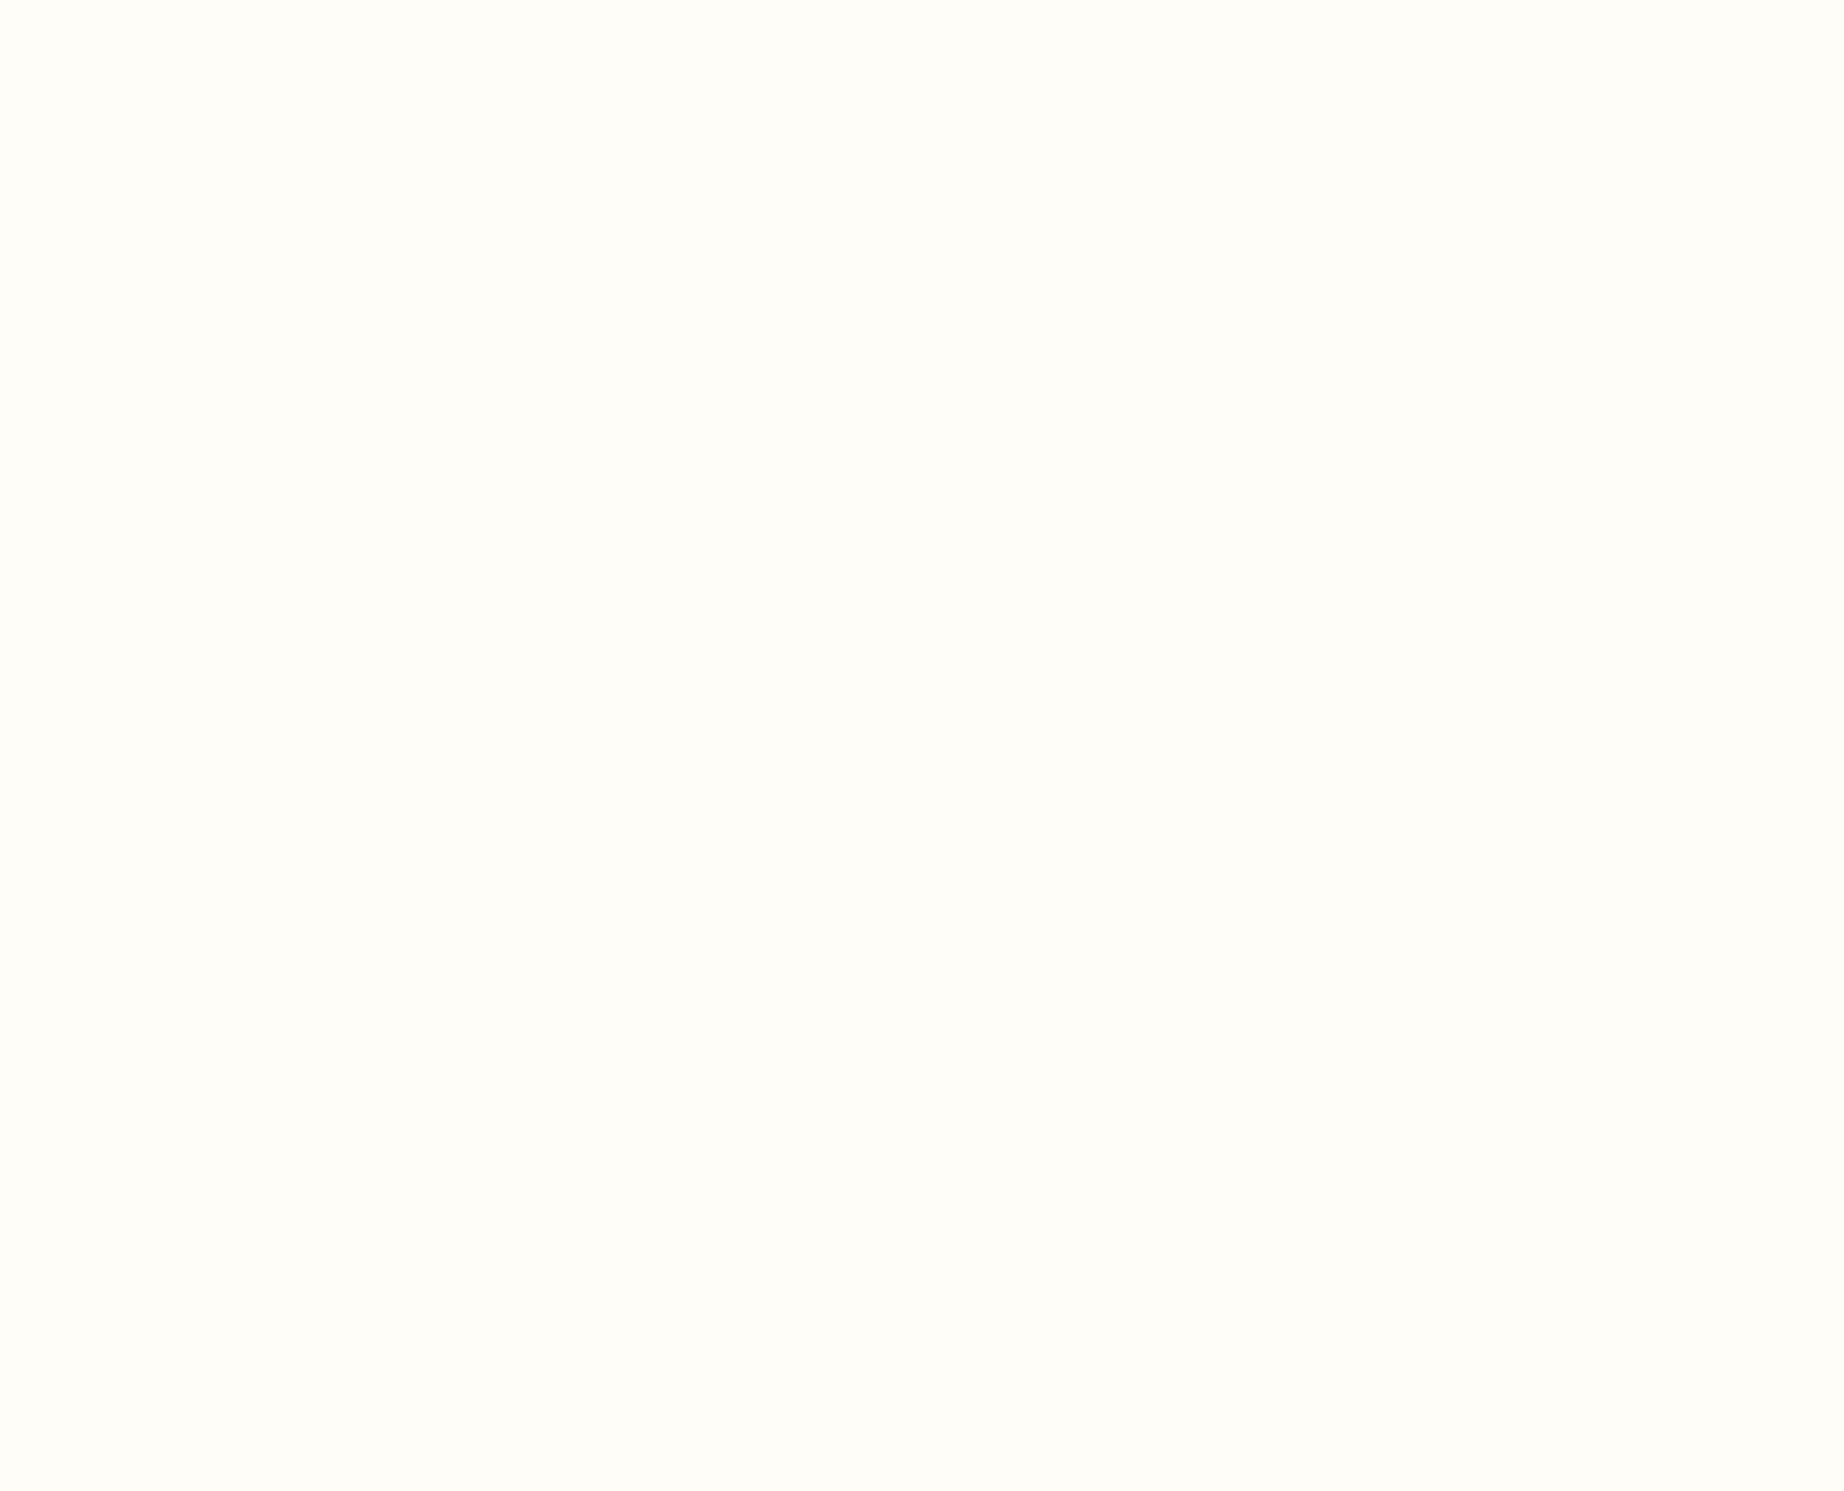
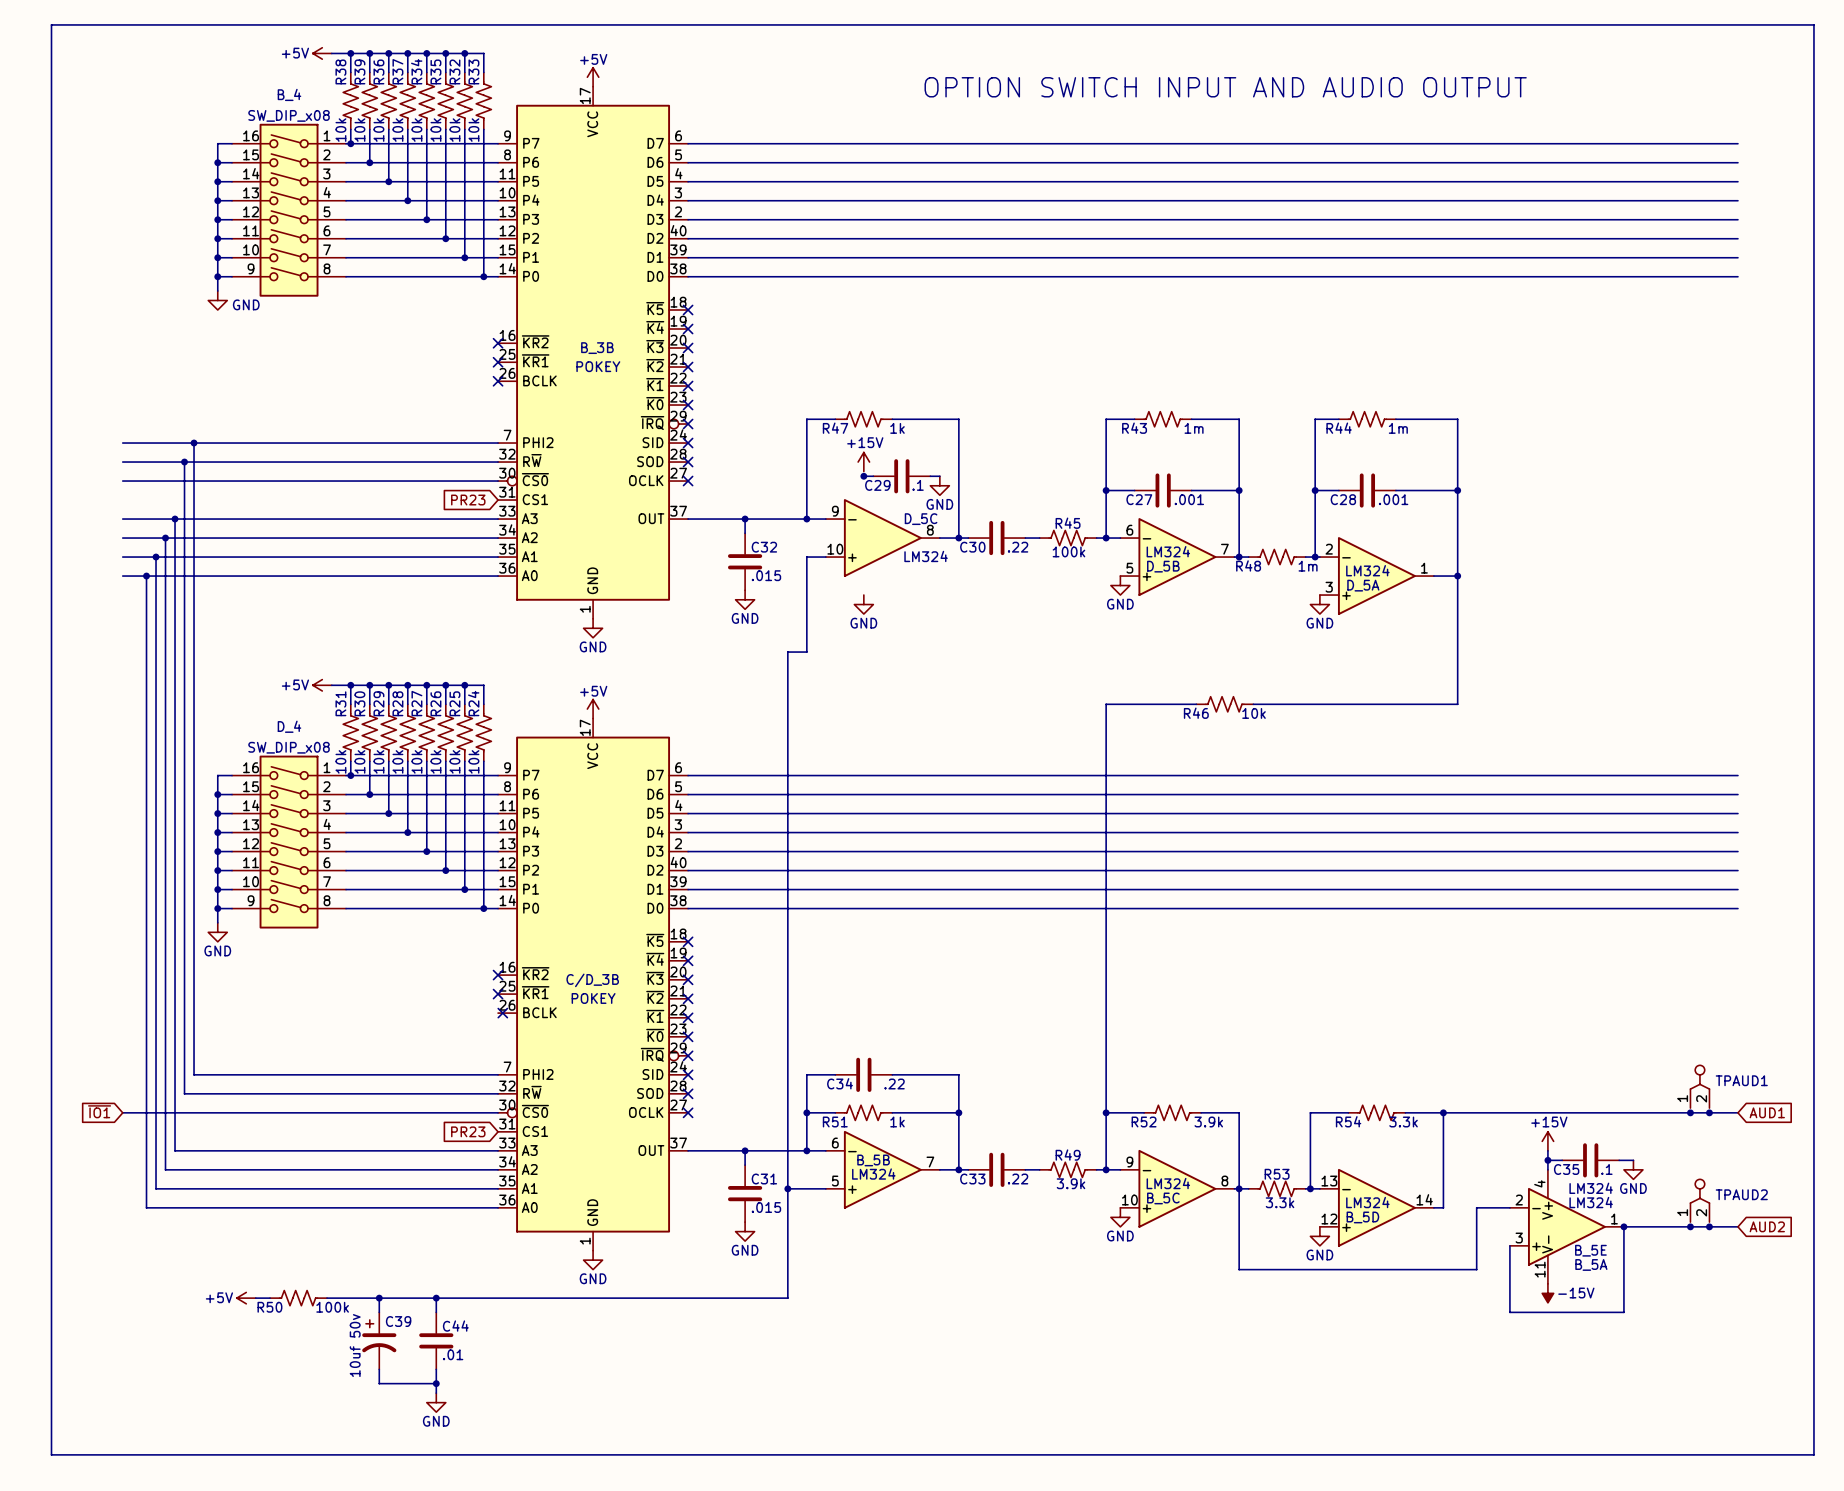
line: none -> (51, 24) (1813, 24) (1813, 1454) (51, 1454) (51, 24)
power symbol: none -> +5V (322, 53)
wire: none -> (331, 53) (483, 53) (483, 72)
wire: none -> (350, 53) (350, 72)
junction: none -> (350, 53)
wire: none -> (369, 53) (369, 72)
junction: none -> (369, 53)
wire: none -> (388, 53) (388, 72)
junction: none -> (388, 53)
wire: none -> (407, 53) (407, 72)
junction: none -> (407, 53)
wire: none -> (426, 53) (426, 72)
junction: none -> (426, 53)
wire: none -> (445, 53) (445, 72)
junction: none -> (445, 53)
wire: none -> (464, 53) (464, 72)
junction: none -> (464, 53)
power symbol: none -> +5V (593, 77)
text: none -> OPTION SWITCH INPUT AND AUDIO OUTPUT (1225, 87)
R38: none -> 10k (350, 100)
R39: none -> 10k (369, 100)
R36: none -> 10k (388, 100)
R37: none -> 10k (407, 100)
R34: none -> 10k (426, 100)
R35: none -> 10k (445, 100)
R32: none -> 10k (464, 100)
R33: none -> 10k (483, 100)
wire: none -> (350, 129) (350, 143)
wire: none -> (369, 129) (369, 162)
wire: none -> (388, 129) (388, 181)
wire: none -> (407, 129) (407, 200)
wire: none -> (426, 129) (426, 219)
wire: none -> (445, 129) (445, 238)
wire: none -> (464, 129) (464, 257)
wire: none -> (483, 129) (483, 276)
wire: none -> (232, 143) (217, 143) (217, 290)
wire: none -> (346, 143) (498, 143)
junction: none -> (350, 143)
wire: none -> (688, 143) (1737, 143)
wire: none -> (217, 162) (232, 162)
junction: none -> (217, 162)
wire: none -> (346, 162) (498, 162)
junction: none -> (369, 162)
wire: none -> (688, 162) (1737, 162)
wire: none -> (217, 181) (232, 181)
junction: none -> (217, 181)
wire: none -> (346, 181) (498, 181)
junction: none -> (388, 181)
wire: none -> (688, 181) (1737, 181)
wire: none -> (217, 200) (232, 200)
junction: none -> (217, 200)
wire: none -> (346, 200) (498, 200)
junction: none -> (407, 200)
wire: none -> (688, 200) (1737, 200)
B_4: none -> SW_DIP_x08 (289, 210)
wire: none -> (217, 219) (232, 219)
junction: none -> (217, 219)
wire: none -> (346, 219) (498, 219)
junction: none -> (426, 219)
wire: none -> (688, 219) (1737, 219)
wire: none -> (217, 238) (232, 238)
junction: none -> (217, 238)
wire: none -> (346, 238) (498, 238)
junction: none -> (445, 238)
wire: none -> (688, 238) (1737, 238)
wire: none -> (217, 257) (232, 257)
junction: none -> (217, 257)
wire: none -> (346, 257) (498, 257)
junction: none -> (464, 257)
wire: none -> (688, 257) (1737, 257)
wire: none -> (217, 276) (232, 276)
junction: none -> (217, 276)
wire: none -> (346, 276) (498, 276)
junction: none -> (483, 276)
wire: none -> (688, 276) (1737, 276)
power symbol: none -> GND (217, 300)
no-connect mark: none -> (688, 310)
no-connect mark: none -> (688, 329)
no-connect mark: none -> (498, 343)
no-connect mark: none -> (688, 348)
B_3B: none -> POKEY (593, 352)
no-connect mark: none -> (498, 362)
no-connect mark: none -> (688, 367)
no-connect mark: none -> (498, 381)
no-connect mark: none -> (688, 386)
no-connect mark: none -> (688, 405)
wire: none -> (835, 419) (806, 419) (806, 519)
R47: none -> 1k (863, 419)
wire: none -> (892, 419) (958, 419) (958, 538)
wire: none -> (1134, 419) (1106, 419) (1106, 538)
R43: none -> 1m (1163, 419)
wire: none -> (1191, 419) (1239, 419) (1239, 557)
wire: none -> (1338, 419) (1315, 419) (1315, 557)
R44: none -> 1m (1367, 419)
wire: none -> (1395, 419) (1457, 419) (1457, 704) (1253, 704)
no-connect mark: none -> (688, 424)
wire: none -> (122, 443) (498, 443)
wire: none -> (194, 443) (194, 1074) (498, 1074)
junction: none -> (194, 443)
no-connect mark: none -> (688, 443)
wire: none -> (122, 462) (498, 462)
wire: none -> (184, 462) (184, 1093) (498, 1093)
junction: none -> (184, 462)
no-connect mark: none -> (688, 462)
power symbol: none -> +15V (863, 462)
wire: none -> (863, 476) (873, 476)
junction: none -> (863, 476)
C29: none -> .1 (901, 476)
wire: none -> (930, 476) (939, 476)
wire: none -> (122, 481) (498, 481)
no-connect mark: none -> (688, 481)
power symbol: none -> GND (939, 485)
wire: none -> (1106, 490) (1134, 490)
junction: none -> (1106, 490)
C27: none -> .001 (1163, 490)
wire: none -> (1191, 490) (1239, 490)
junction: none -> (1239, 490)
wire: none -> (1315, 490) (1338, 490)
junction: none -> (1315, 490)
C28: none -> .001 (1367, 490)
wire: none -> (1395, 490) (1457, 490)
junction: none -> (1457, 490)
global label: none -> PR23 (468, 500)
wire: none -> (122, 519) (498, 519)
wire: none -> (175, 519) (175, 1150) (498, 1150)
junction: none -> (175, 519)
wire: none -> (688, 519) (825, 519)
wire: none -> (745, 519) (745, 533)
junction: none -> (745, 519)
junction: none -> (806, 519)
wire: none -> (122, 538) (498, 538)
wire: none -> (165, 538) (165, 1169) (498, 1169)
junction: none -> (165, 538)
D_5C: none -> LM324 (882, 538)
wire: none -> (939, 538) (968, 538)
junction: none -> (958, 538)
C30: none -> .22 (996, 538)
wire: none -> (1025, 538) (1039, 538)
R45: none -> 100k (1068, 538)
wire: none -> (1096, 538) (1120, 538)
junction: none -> (1106, 538)
wire: none -> (122, 557) (498, 557)
wire: none -> (156, 557) (156, 1188) (498, 1188)
junction: none -> (156, 557)
wire: none -> (825, 557) (806, 557) (806, 652) (787, 652) (787, 1298) (327, 1298)
D_5B: none -> LM324 (1177, 557)
wire: none -> (1234, 557) (1248, 557)
junction: none -> (1239, 557)
R48: none -> 1m (1277, 557)
wire: none -> (1305, 557) (1319, 557)
junction: none -> (1315, 557)
C32: none -> .015 (745, 561)
wire: none -> (122, 576) (498, 576)
wire: none -> (146, 576) (146, 1207) (498, 1207)
junction: none -> (146, 576)
D_5A: none -> LM324 (1376, 576)
wire: none -> (1433, 576) (1457, 576)
junction: none -> (1457, 576)
power symbol: none -> GND (1120, 585)
power symbol: none -> GND (745, 599)
power symbol: none -> GND (863, 604)
power symbol: none -> GND (1319, 604)
power symbol: none -> GND (593, 628)
power symbol: none -> +5V (322, 685)
wire: none -> (331, 685) (483, 685) (483, 704)
wire: none -> (350, 685) (350, 704)
junction: none -> (350, 685)
wire: none -> (369, 685) (369, 704)
junction: none -> (369, 685)
wire: none -> (388, 685) (388, 704)
junction: none -> (388, 685)
wire: none -> (407, 685) (407, 704)
junction: none -> (407, 685)
wire: none -> (426, 685) (426, 704)
junction: none -> (426, 685)
wire: none -> (445, 685) (445, 704)
junction: none -> (445, 685)
wire: none -> (464, 685) (464, 704)
junction: none -> (464, 685)
wire: none -> (1196, 704) (1106, 704) (1106, 1169)
R46: none -> 10k (1224, 704)
power symbol: none -> +5V (593, 709)
R31: none -> 10k (350, 732)
R30: none -> 10k (369, 732)
R29: none -> 10k (388, 732)
R28: none -> 10k (407, 732)
R27: none -> 10k (426, 732)
R26: none -> 10k (445, 732)
R25: none -> 10k (464, 732)
R24: none -> 10k (483, 732)
wire: none -> (350, 761) (350, 775)
wire: none -> (369, 761) (369, 794)
wire: none -> (388, 761) (388, 813)
wire: none -> (407, 761) (407, 832)
wire: none -> (426, 761) (426, 851)
wire: none -> (445, 761) (445, 870)
wire: none -> (464, 761) (464, 889)
wire: none -> (483, 761) (483, 908)
wire: none -> (232, 775) (217, 775) (217, 922)
wire: none -> (346, 775) (498, 775)
junction: none -> (350, 775)
wire: none -> (688, 775) (1737, 775)
wire: none -> (217, 794) (232, 794)
junction: none -> (217, 794)
wire: none -> (346, 794) (498, 794)
junction: none -> (369, 794)
wire: none -> (688, 794) (1737, 794)
wire: none -> (217, 813) (232, 813)
junction: none -> (217, 813)
wire: none -> (346, 813) (498, 813)
junction: none -> (388, 813)
wire: none -> (688, 813) (1737, 813)
wire: none -> (217, 832) (232, 832)
junction: none -> (217, 832)
wire: none -> (346, 832) (498, 832)
junction: none -> (407, 832)
wire: none -> (688, 832) (1737, 832)
D_4: none -> SW_DIP_x08 (289, 842)
wire: none -> (217, 851) (232, 851)
junction: none -> (217, 851)
wire: none -> (346, 851) (498, 851)
junction: none -> (426, 851)
wire: none -> (688, 851) (1737, 851)
wire: none -> (217, 870) (232, 870)
junction: none -> (217, 870)
wire: none -> (346, 870) (498, 870)
junction: none -> (445, 870)
wire: none -> (688, 870) (1737, 870)
wire: none -> (217, 889) (232, 889)
junction: none -> (217, 889)
wire: none -> (346, 889) (498, 889)
junction: none -> (464, 889)
wire: none -> (688, 889) (1737, 889)
wire: none -> (217, 908) (232, 908)
junction: none -> (217, 908)
wire: none -> (346, 908) (498, 908)
junction: none -> (483, 908)
wire: none -> (688, 908) (1737, 908)
power symbol: none -> GND (217, 932)
no-connect mark: none -> (688, 941)
no-connect mark: none -> (688, 960)
no-connect mark: none -> (498, 975)
no-connect mark: none -> (688, 979)
C/D_3B: none -> POKEY (593, 984)
no-connect mark: none -> (498, 994)
no-connect mark: none -> (688, 998)
no-connect mark: none -> (502, 1013)
no-connect mark: none -> (688, 1017)
no-connect mark: none -> (688, 1036)
no-connect mark: none -> (688, 1055)
no-connect mark: none -> (688, 1074)
wire: none -> (835, 1074) (806, 1074) (806, 1150)
C34: none -> .22 (863, 1074)
wire: none -> (892, 1074) (958, 1074) (958, 1169)
TPAUD1: none -> (1699, 1086)
no-connect mark: none -> (688, 1093)
global label: none -> ~{IO1} (99, 1111)
wire: none -> (122, 1112) (498, 1112)
no-connect mark: none -> (688, 1112)
wire: none -> (806, 1112) (835, 1112)
junction: none -> (806, 1112)
R51: none -> 1k (863, 1112)
wire: none -> (892, 1112) (958, 1112)
junction: none -> (958, 1112)
wire: none -> (1106, 1112) (1144, 1112)
junction: none -> (1106, 1112)
R52: none -> 3.9k (1172, 1112)
wire: none -> (1201, 1112) (1239, 1112) (1239, 1269) (1476, 1269) (1476, 1207) (1509, 1207)
wire: none -> (1348, 1112) (1310, 1112) (1310, 1188)
R54: none -> 3.3k (1376, 1112)
wire: none -> (1405, 1112) (1737, 1112)
wire: none -> (1443, 1112) (1443, 1207) (1433, 1207)
junction: none -> (1443, 1112)
junction: none -> (1690, 1112)
junction: none -> (1709, 1112)
global label: none -> AUD1 (1767, 1112)
global label: none -> PR23 (468, 1131)
power symbol: none -> +15V (1547, 1141)
wire: none -> (688, 1150) (825, 1150)
wire: none -> (745, 1150) (745, 1165)
junction: none -> (745, 1150)
junction: none -> (806, 1150)
wire: none -> (1547, 1150) (1547, 1169)
wire: none -> (1547, 1160) (1562, 1160)
junction: none -> (1547, 1160)
C35: none -> .1 (1590, 1160)
wire: none -> (1619, 1160) (1633, 1160)
B_5B: none -> LM324 (882, 1169)
wire: none -> (939, 1169) (968, 1169)
junction: none -> (958, 1169)
C33: none -> .22 (996, 1169)
wire: none -> (1025, 1169) (1039, 1169)
R49: none -> 3.9k (1068, 1169)
wire: none -> (1096, 1169) (1120, 1169)
junction: none -> (1106, 1169)
power symbol: none -> GND (1633, 1169)
wire: none -> (787, 1188) (825, 1188)
junction: none -> (787, 1188)
B_5C: none -> LM324 (1177, 1188)
wire: none -> (1234, 1188) (1248, 1188)
junction: none -> (1239, 1188)
R53: none -> 3.3k (1277, 1188)
wire: none -> (1305, 1188) (1319, 1188)
junction: none -> (1310, 1188)
C31: none -> .015 (745, 1193)
TPAUD2: none -> (1699, 1200)
B_5D: none -> LM324 (1376, 1207)
power symbol: none -> GND (1120, 1217)
B_5E: none -> LM324 (1547, 1226)
B_5A: none -> LM324 (1566, 1226)
junction: none -> (1623, 1226)
junction: none -> (1690, 1226)
junction: none -> (1709, 1226)
wire: none -> (1737, 1226) (1623, 1226) (1623, 1312) (1509, 1312) (1509, 1245)
global label: none -> AUD2 (1767, 1226)
power symbol: none -> GND (745, 1231)
power symbol: none -> GND (1319, 1236)
power symbol: none -> GND (593, 1260)
power symbol: none -> -15V (1547, 1293)
power symbol: none -> +5V (246, 1298)
wire: none -> (255, 1298) (270, 1298)
R50: none -> 100k (298, 1298)
wire: none -> (379, 1298) (379, 1312)
junction: none -> (379, 1298)
wire: none -> (436, 1298) (436, 1312)
junction: none -> (436, 1298)
C39: none -> 10uf 50v (379, 1340)
C44: none -> .01 (436, 1340)
wire: none -> (379, 1369) (379, 1383) (436, 1383)
wire: none -> (436, 1369) (436, 1393)
junction: none -> (436, 1383)
power symbol: none -> GND (436, 1402)

